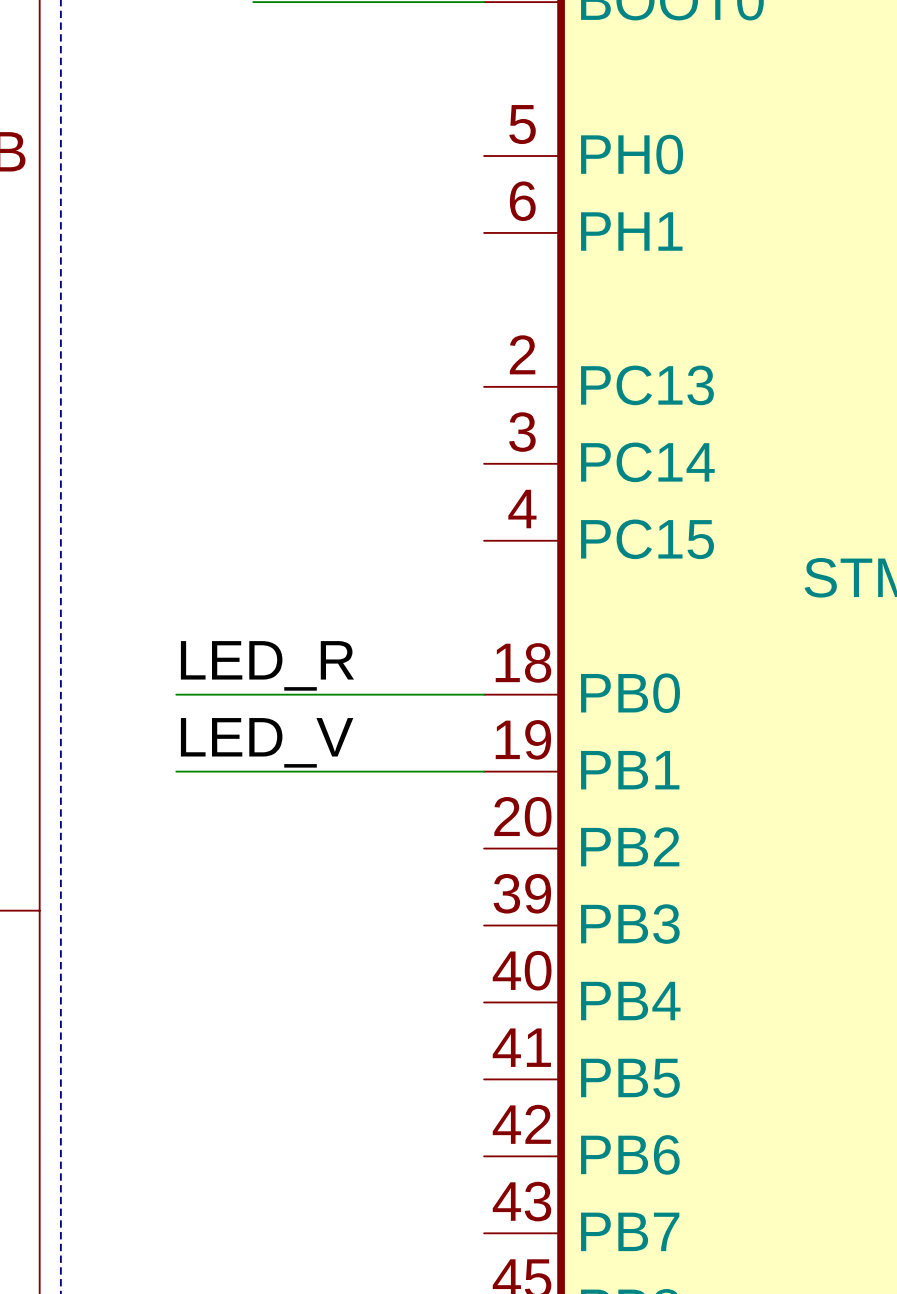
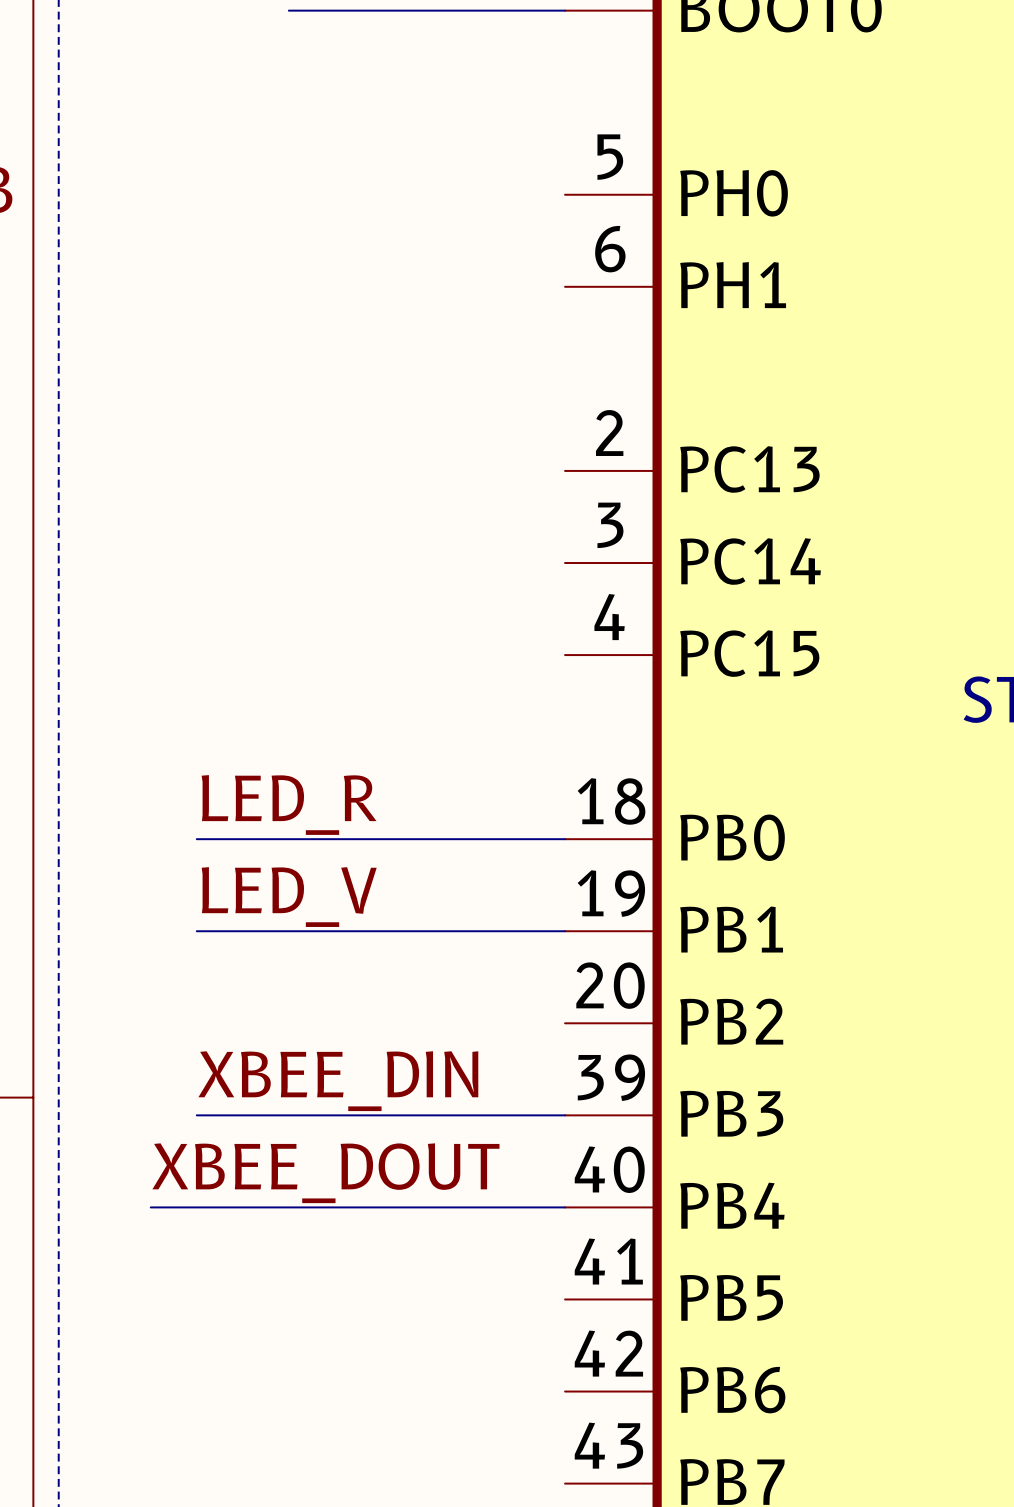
label: none -> XBEE_DIN (338, 1081)
wire: none -> (196, 1115) (565, 1115)
label: none -> XBEE_DOUT (325, 1173)
wire: none -> (150, 1207) (565, 1207)

